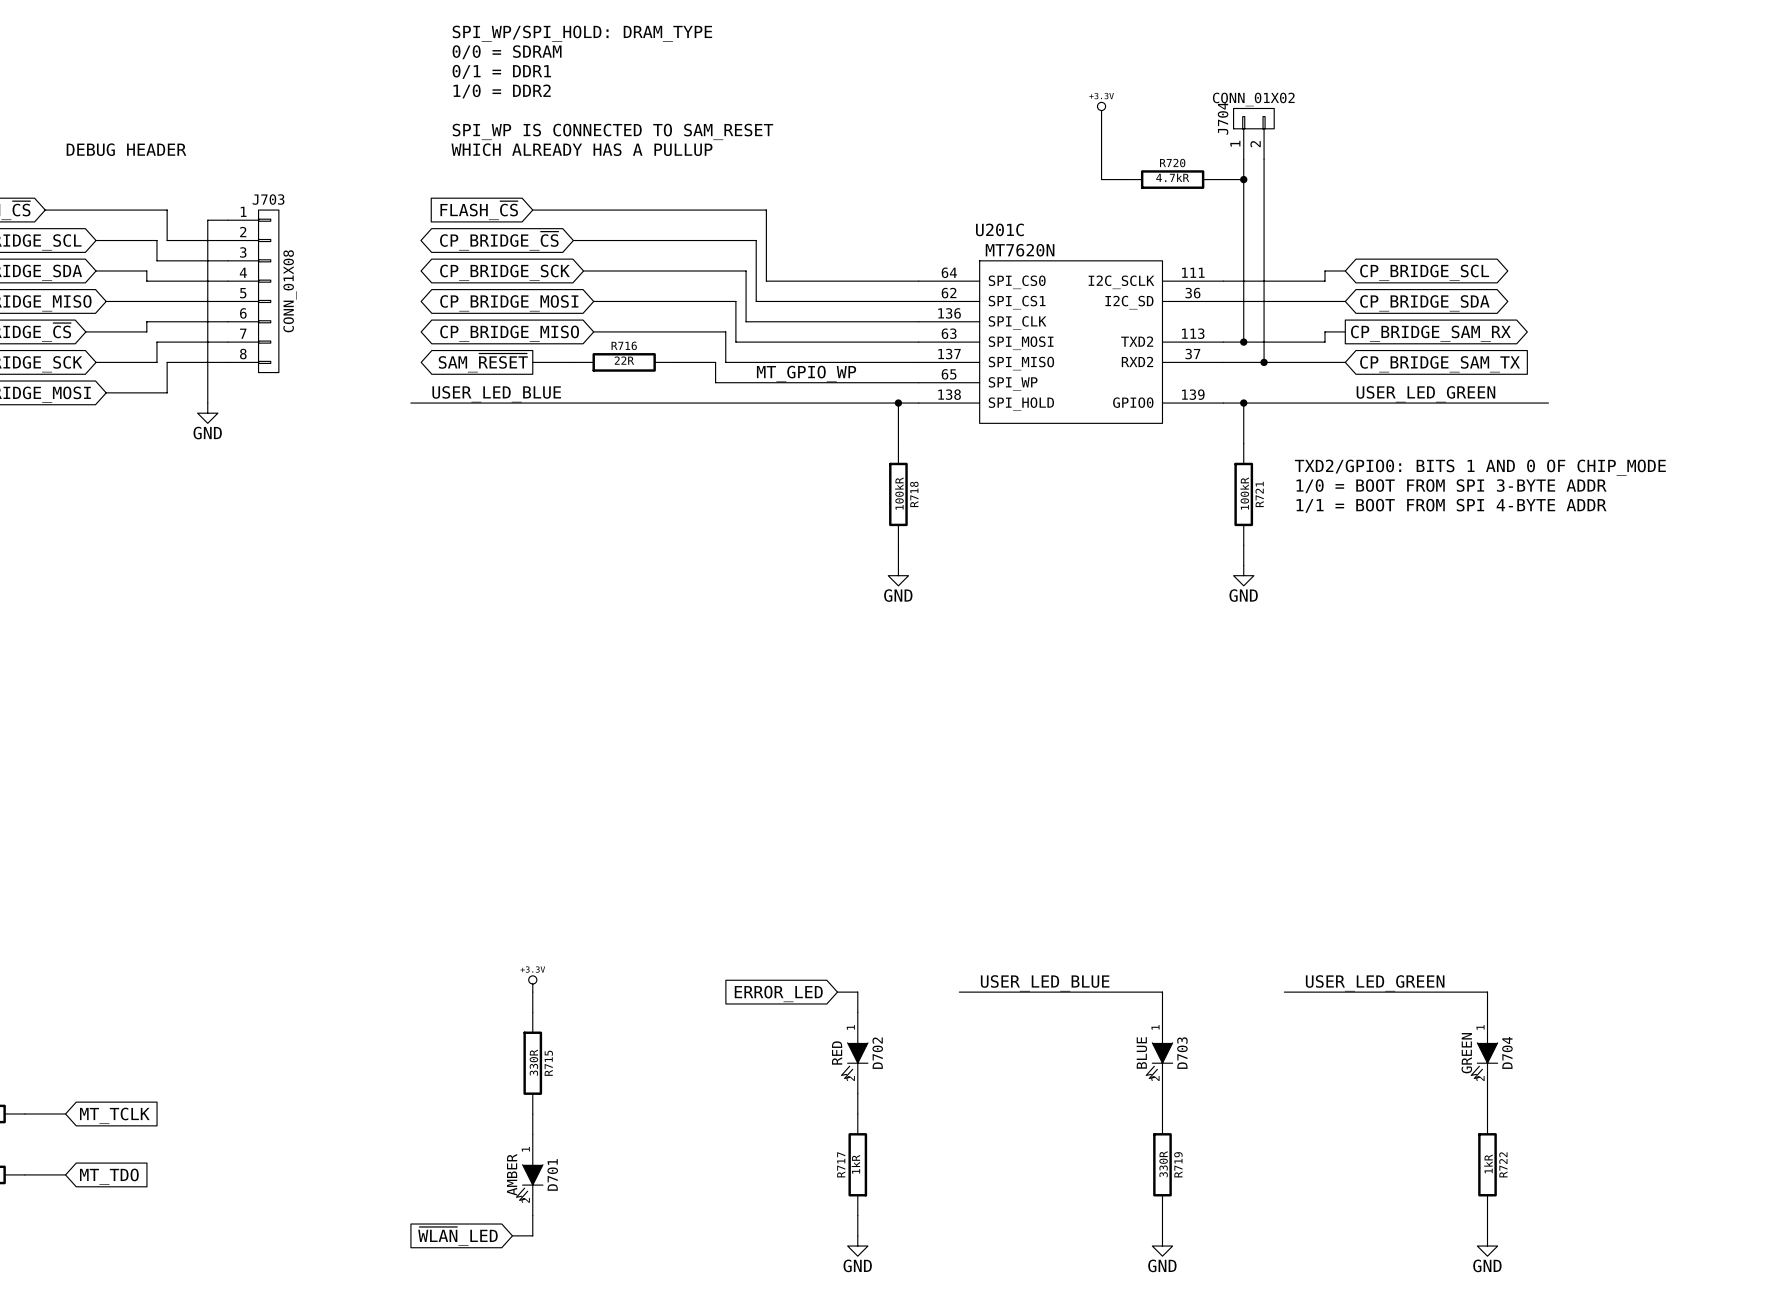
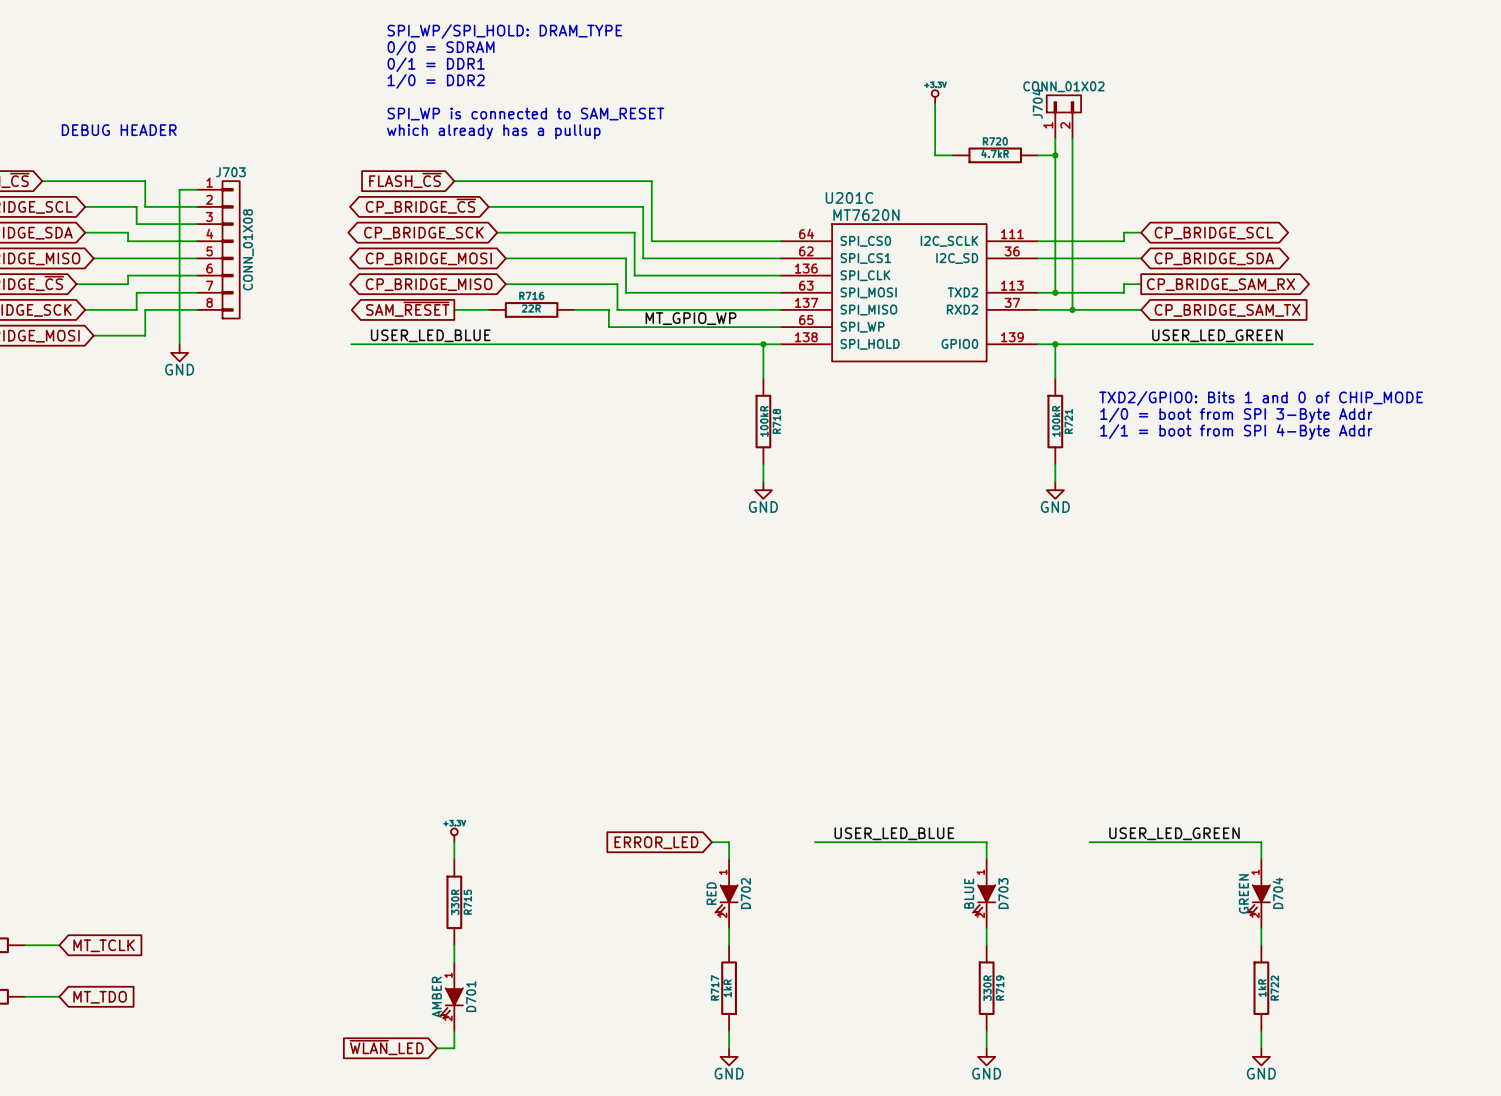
text: SPI_WP IS CONNECTED TO SAM_RESET (612, 131) -> SPI_WP is connected to SAM_RESET (525, 114)
text: WHICH ALREADY HAS A PULLUP (581, 149) -> which already has a pullup (493, 131)
text: TXD2/GPIO0: BITS 1 AND 0 OF CHIP_MODE (1480, 467) -> TXD2/GPIO0: Bits 1 and 0 of CHIP_MODE (1261, 398)
text: 1/0 = BOOT FROM SPI 3-BYTE ADDR (1451, 486) -> 1/0 = boot from SPI 3-Byte Addr (1236, 415)
text: 1/1 = BOOT FROM SPI 4-BYTE ADDR (1451, 505) -> 1/1 = boot from SPI 4-Byte Addr (1236, 432)

